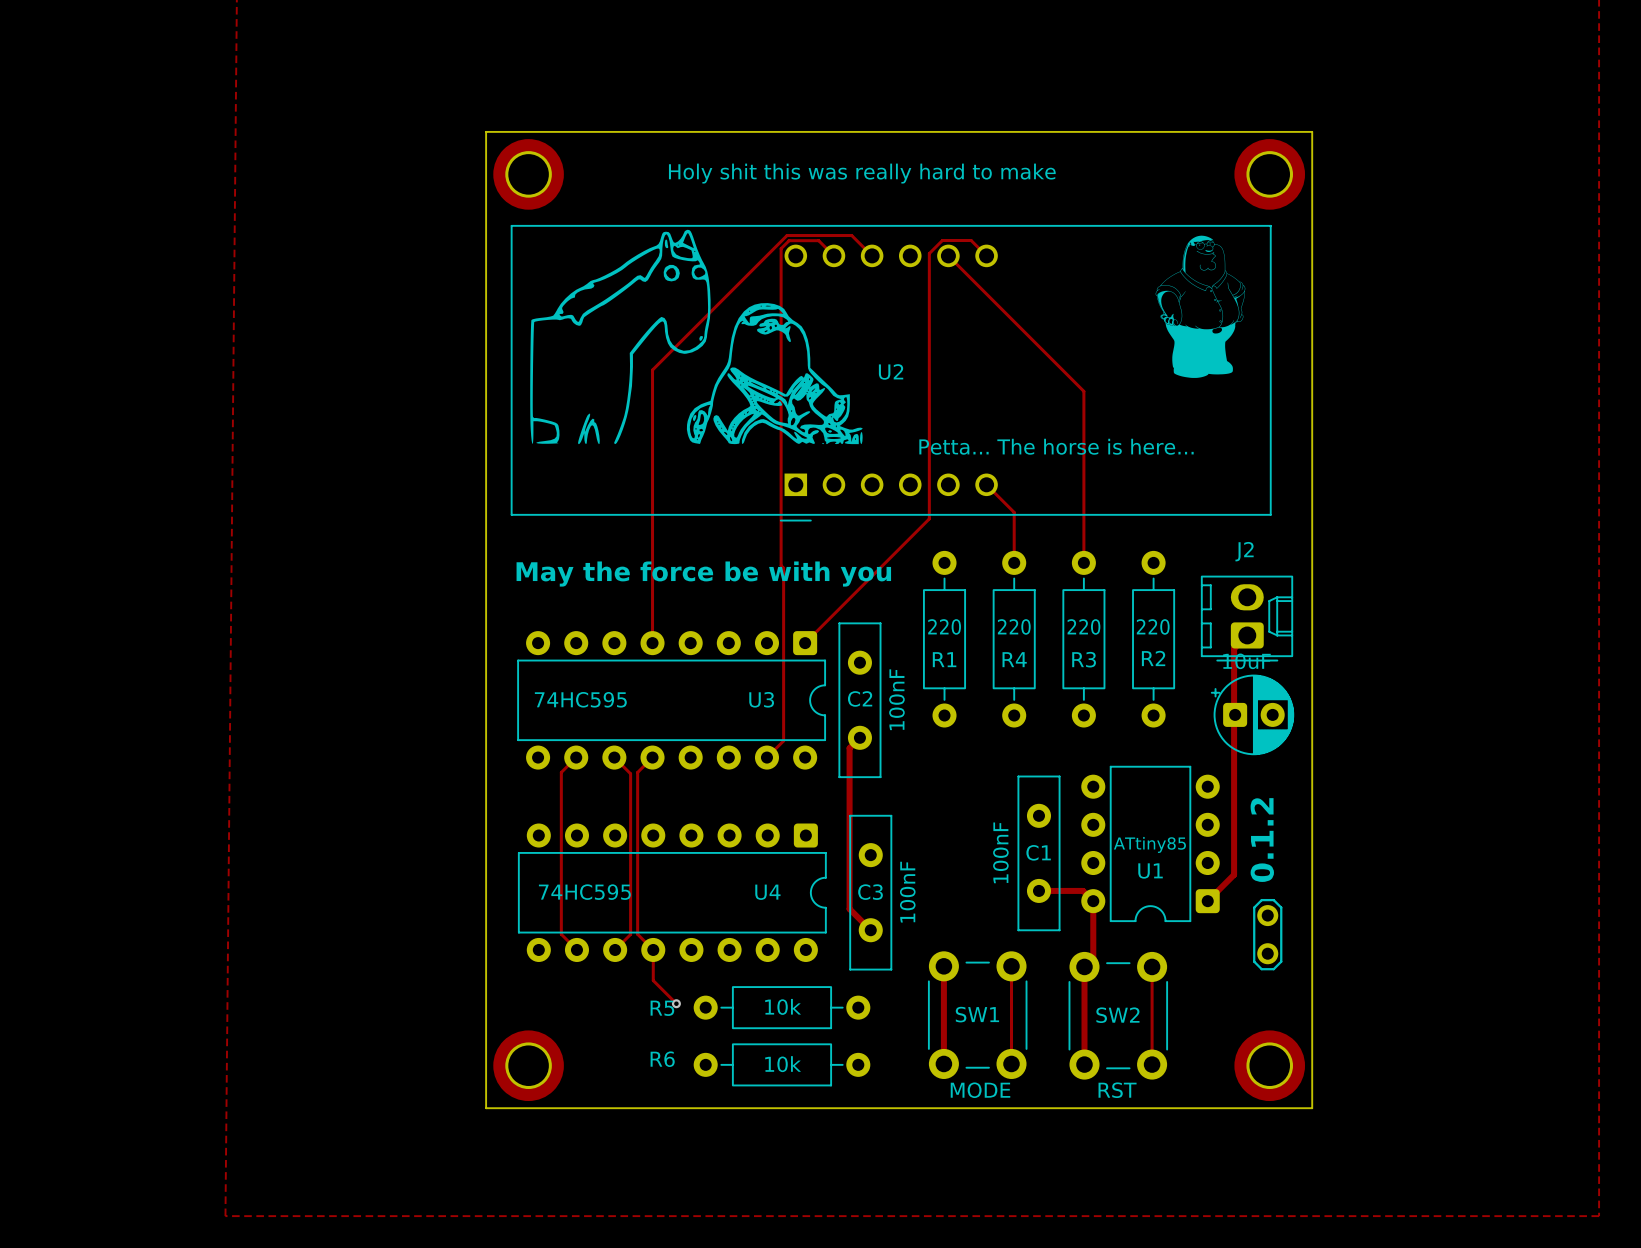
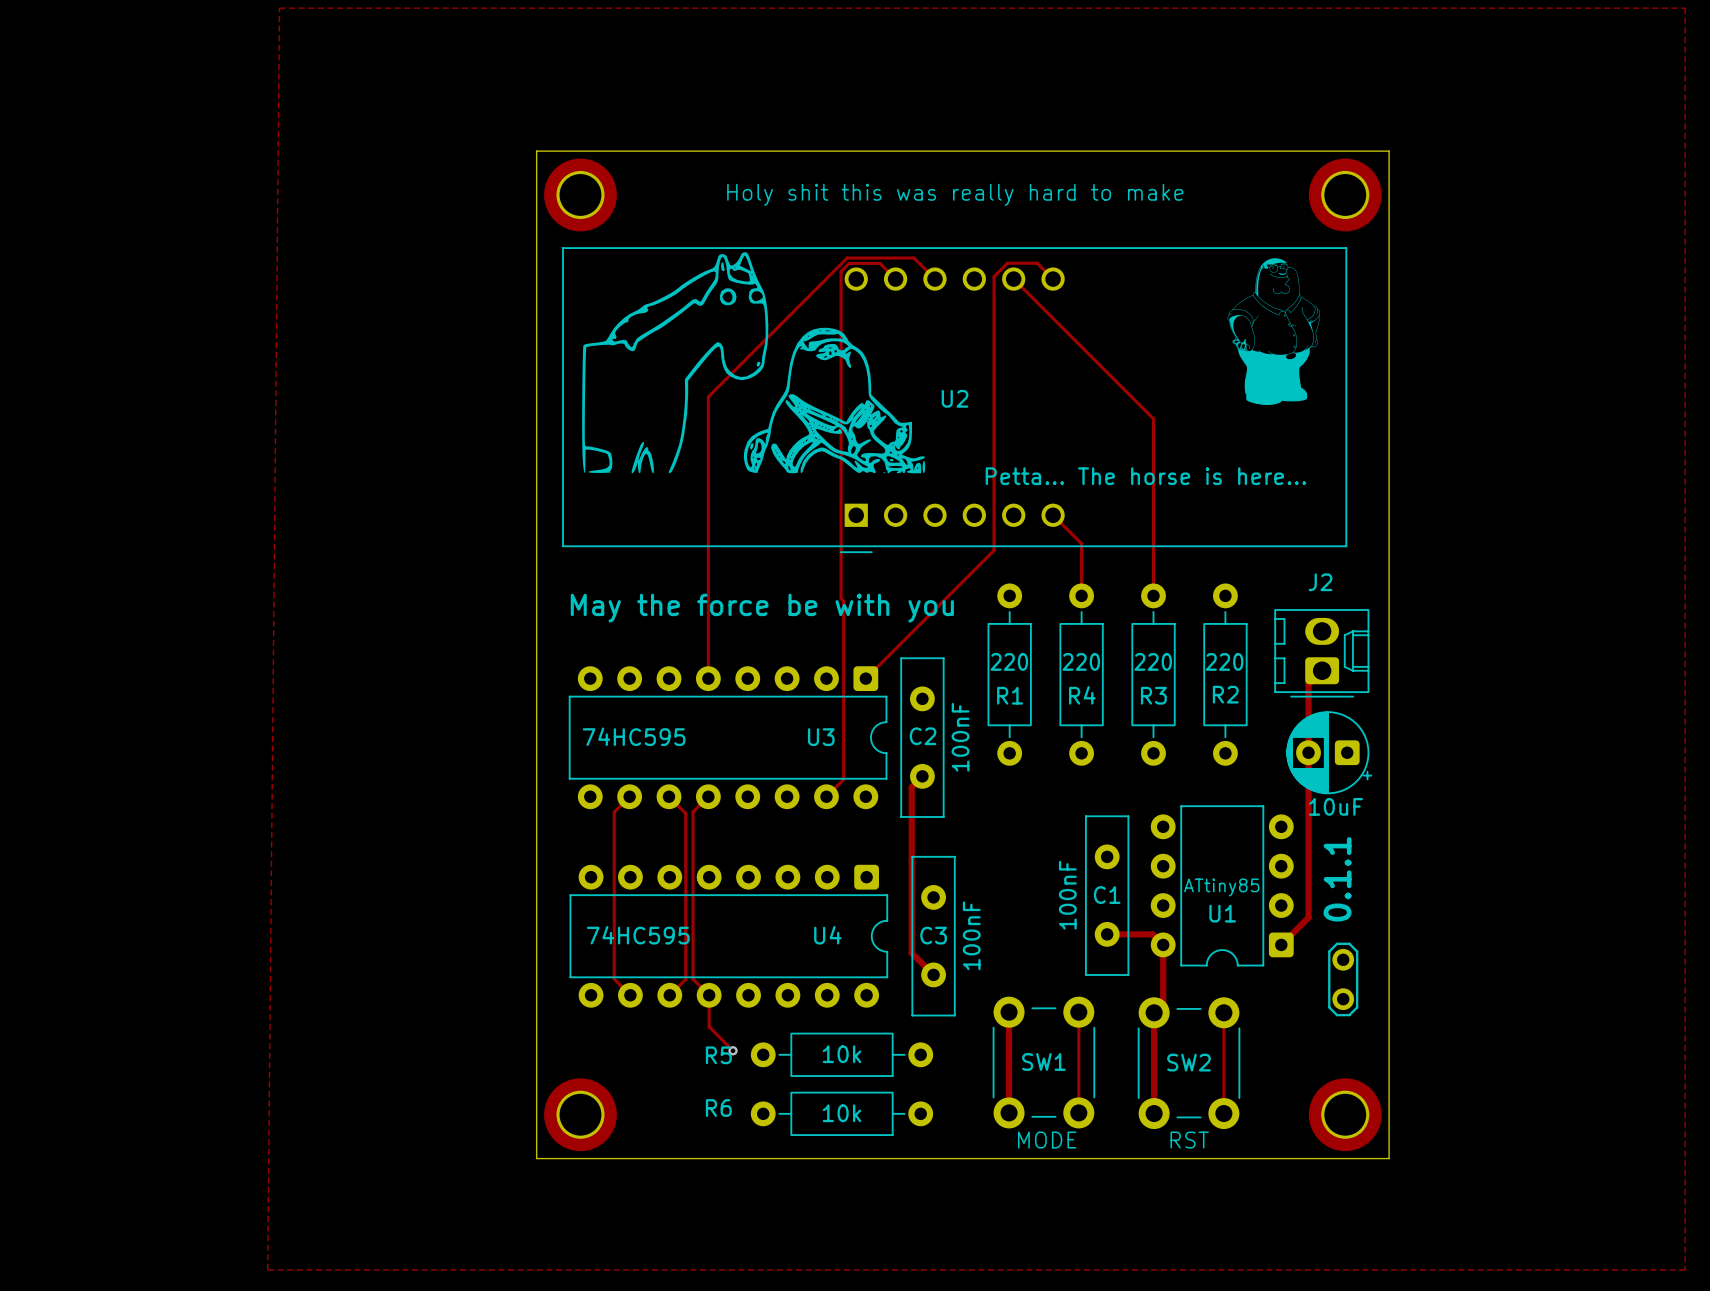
part rotation: 0° (1252, 714) -> 180° (1329, 752)
text: 0.1.2 (1262, 840) -> 0.1.1 (1337, 879)

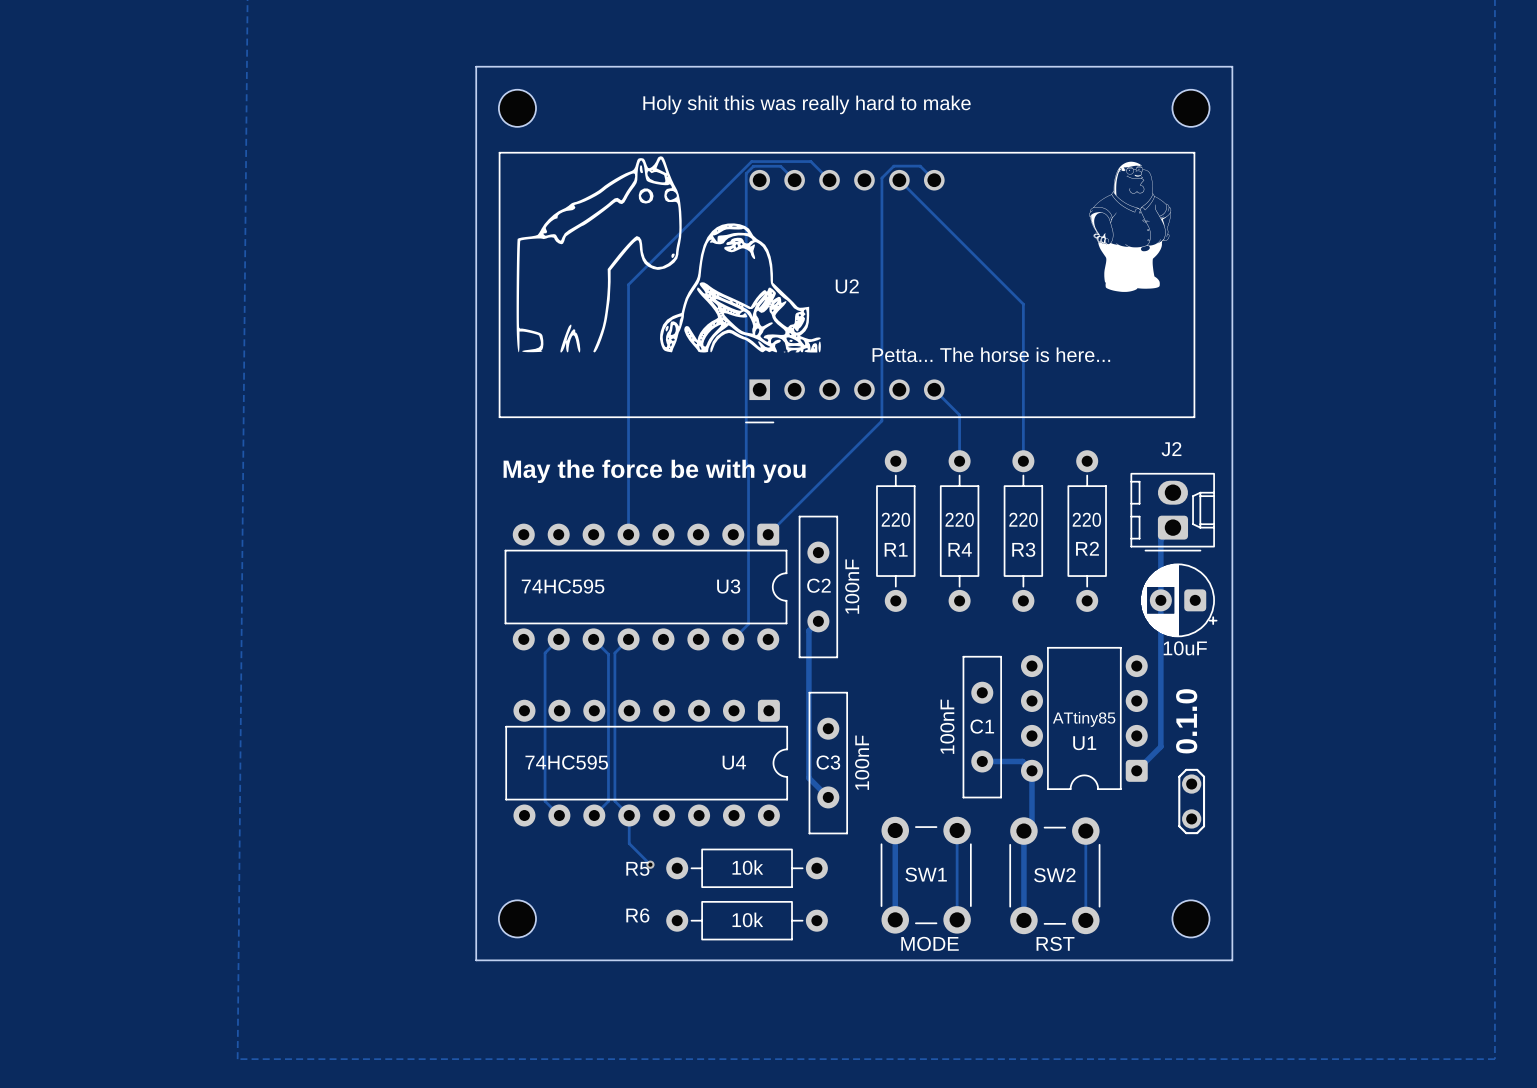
part footprint: [544, 158, 617, 232] -> [498, 89, 537, 127]
part footprint: [1308, 158, 1382, 232] -> [1172, 89, 1210, 127]
text: 0.1.1 (1337, 879) -> 0.1.0 (1186, 721)
part footprint: [544, 1078, 617, 1152] -> [498, 900, 537, 938]
part footprint: [1308, 1078, 1382, 1152] -> [1172, 900, 1210, 938]

